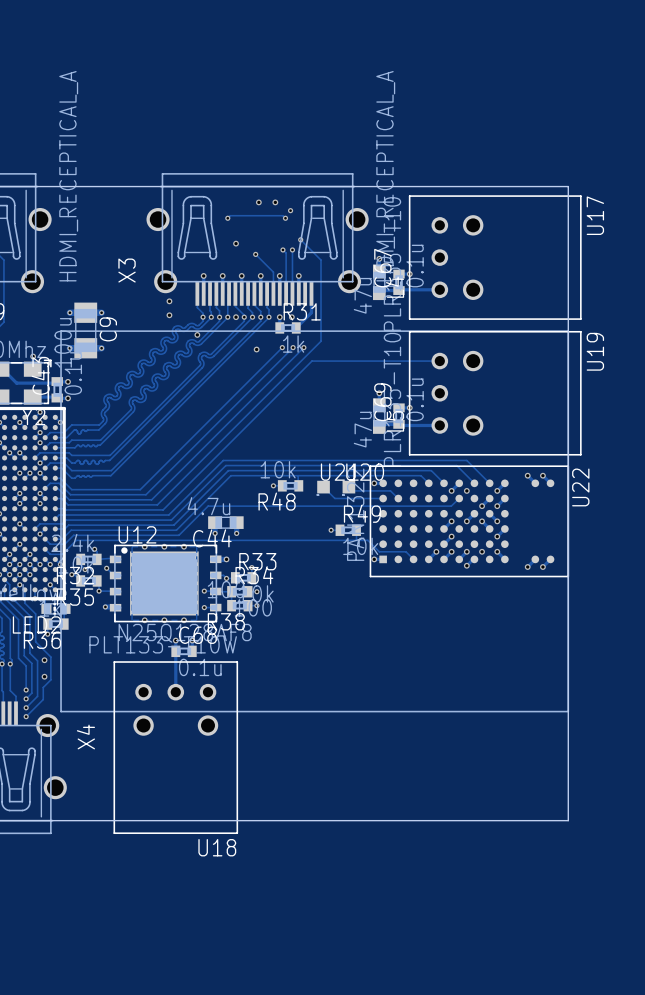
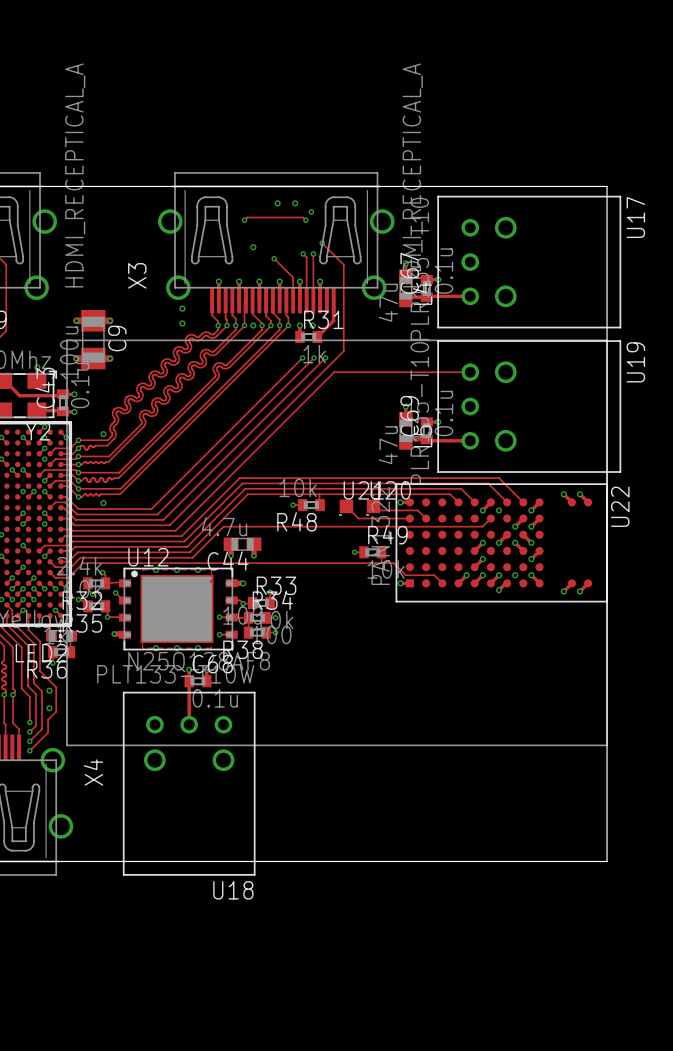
via: (197, 334) -> none
via: (256, 349) -> none
via: none -> (103, 434)
via: none -> (78, 440)
via: none -> (78, 448)
via: none -> (78, 456)
via: none -> (78, 464)
via: none -> (78, 472)
via: none -> (78, 480)
via: none -> (78, 488)
via: none -> (78, 496)
via: none -> (103, 503)

